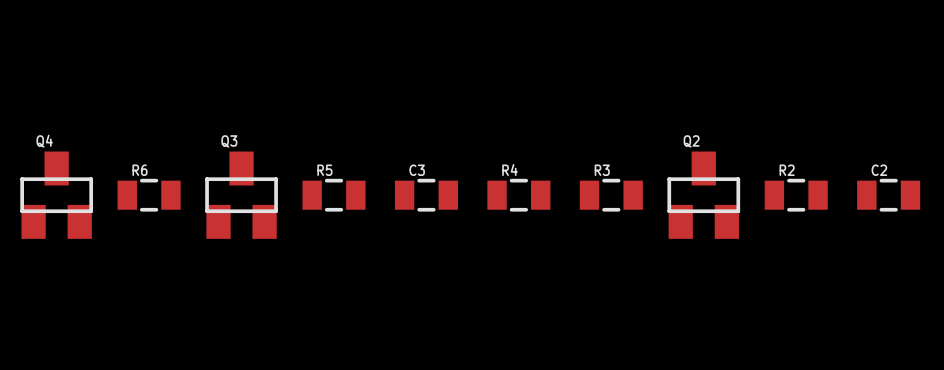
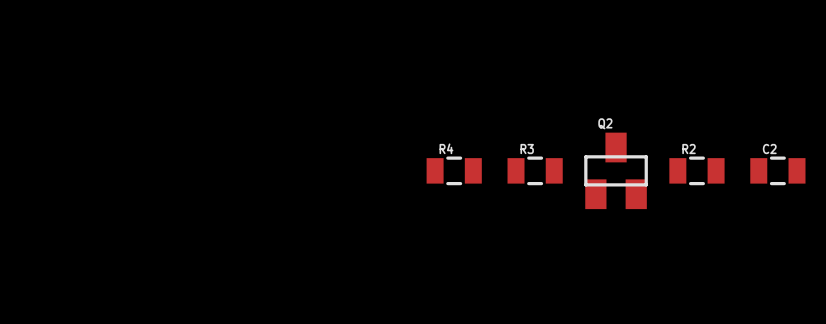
Q4: (56, 195) -> none
R6: (149, 195) -> none
Q3: (241, 195) -> none
R5: (334, 195) -> none
C3: (426, 195) -> none

